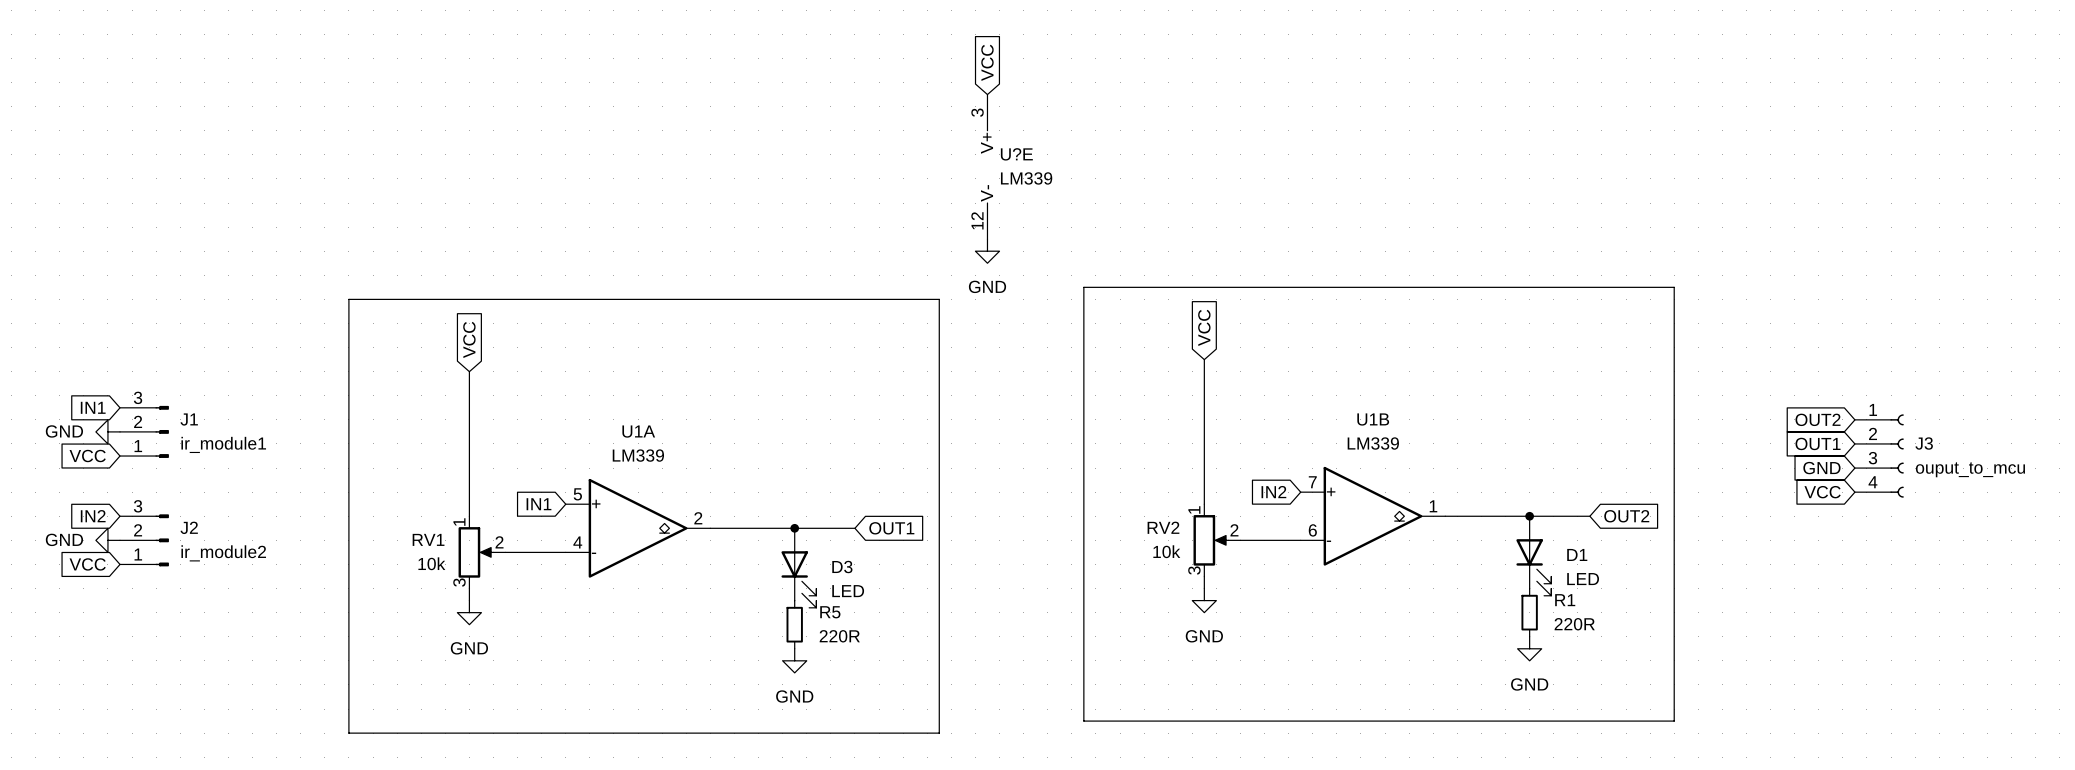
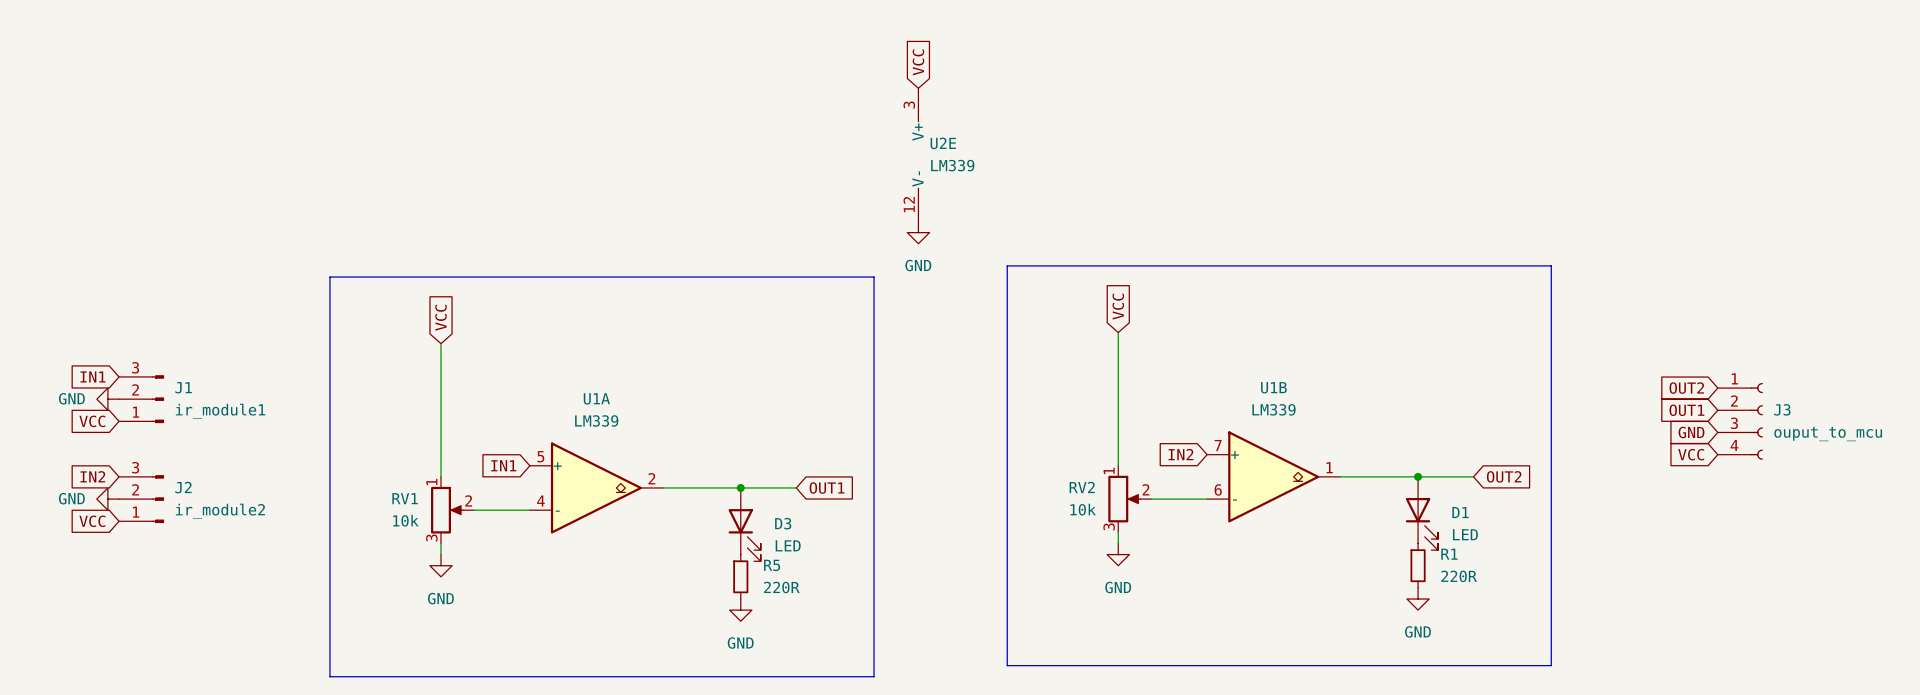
U?E name: U?E (1016, 154) -> U2E (943, 143)

